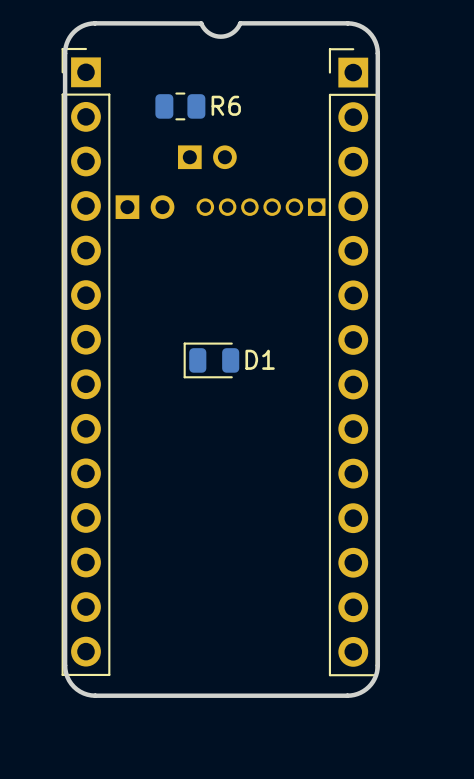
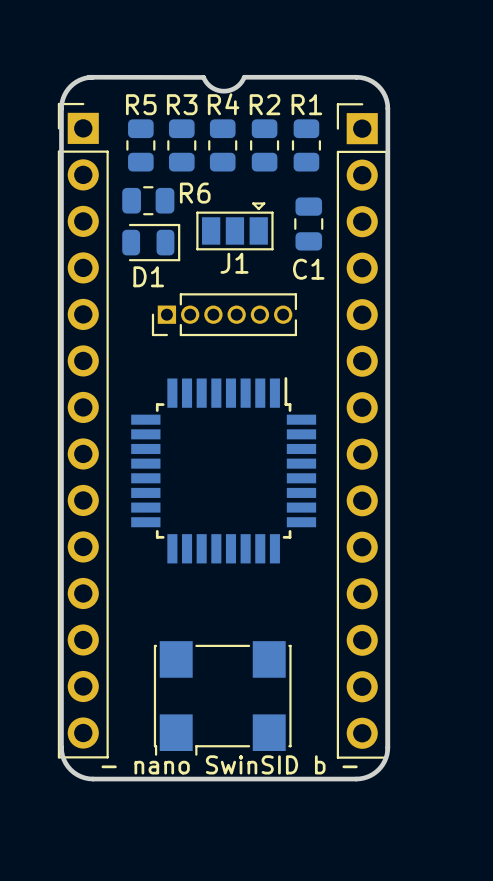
R5: none -> (140, 145)
R3: none -> (181, 145)
R4: none -> (222, 145)
R2: none -> (264, 145)
R1: none -> (306, 145)
R6 name position: R6 (226, 105) -> R6 (195, 193)
R6 position: (180, 106) -> (148, 200)
part: (207, 157) -> none
C1: none -> (308, 223)
J1: none -> (234, 226)
part: (145, 207) -> none
part side: top (261, 207) -> bottom (224, 314)
D1 name position: D1 (260, 359) -> D1 (148, 276)
D1 rotation: 0° (211, 360) -> 180° (151, 242)
D1 position: (211, 360) -> (151, 242)
part: none -> (223, 470)
part: none -> (222, 698)
text: none -> - nano SwinSID b - (229, 764)

